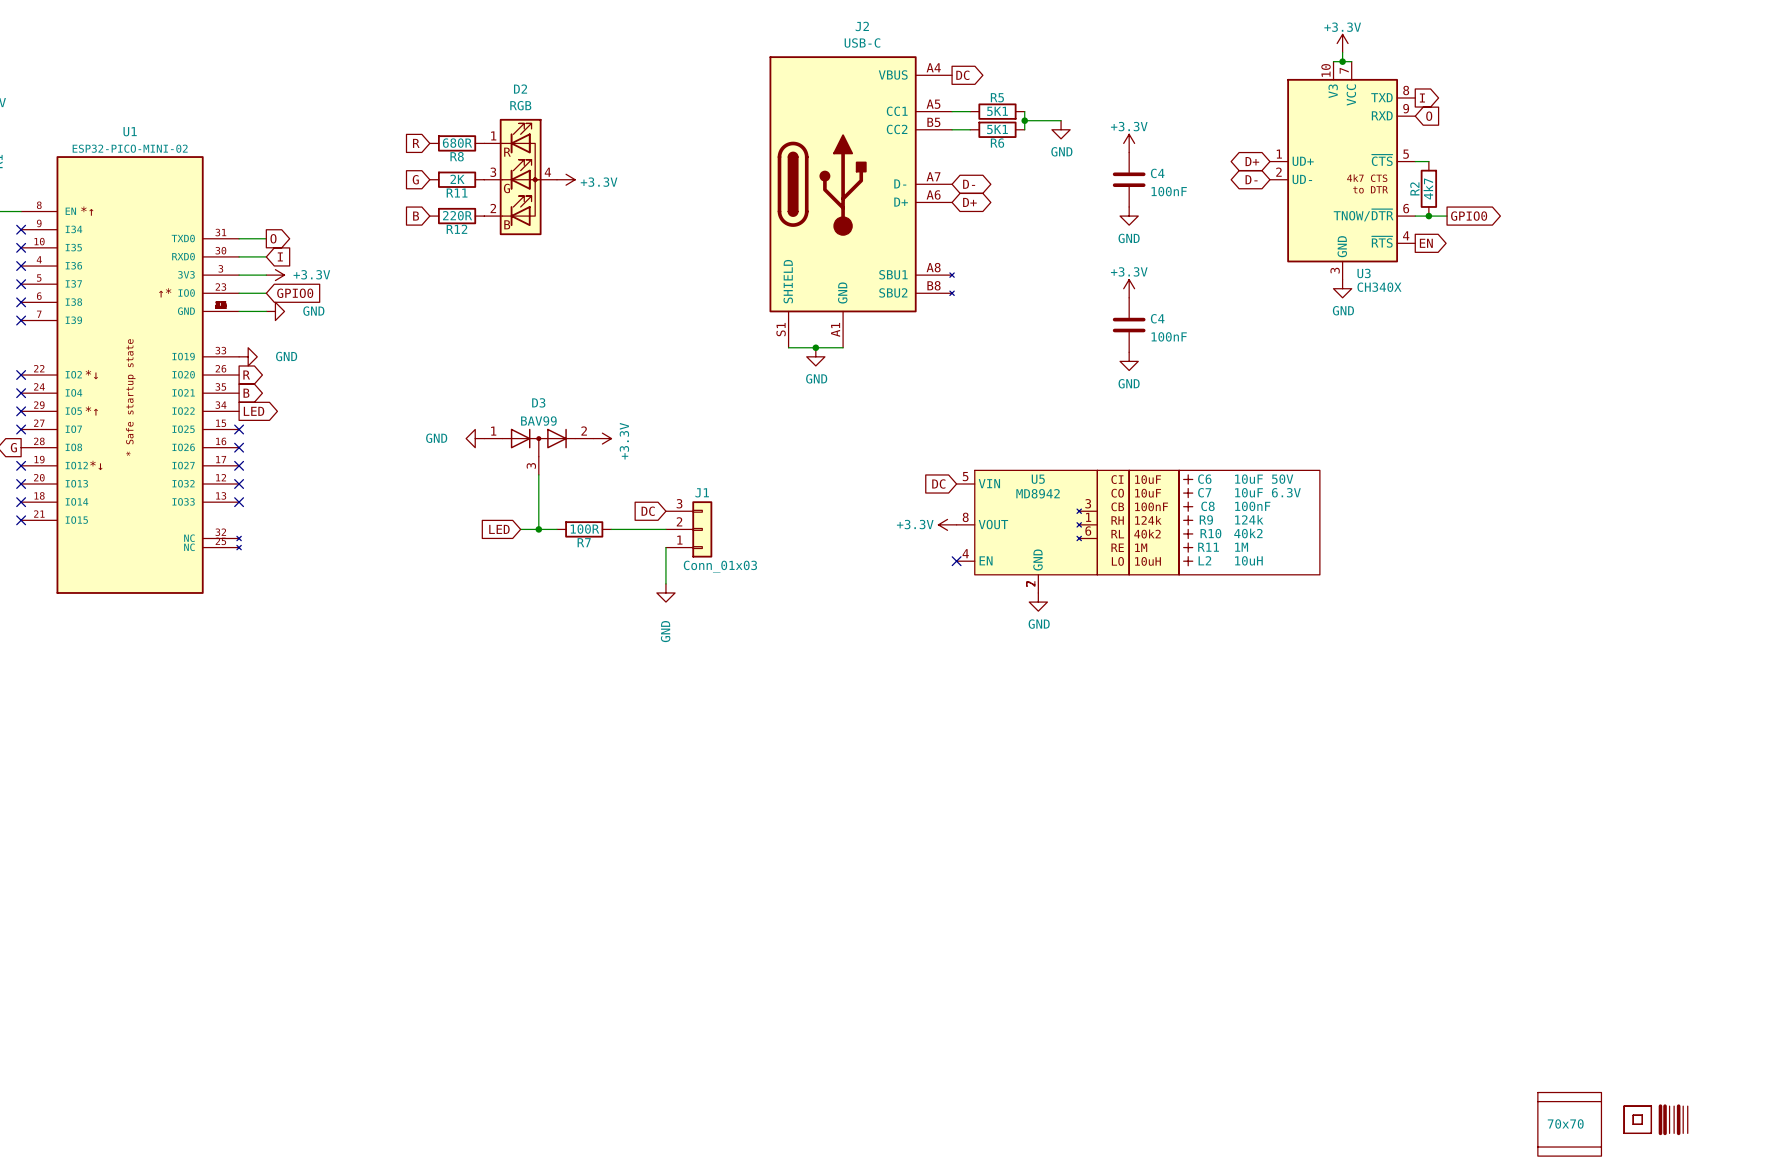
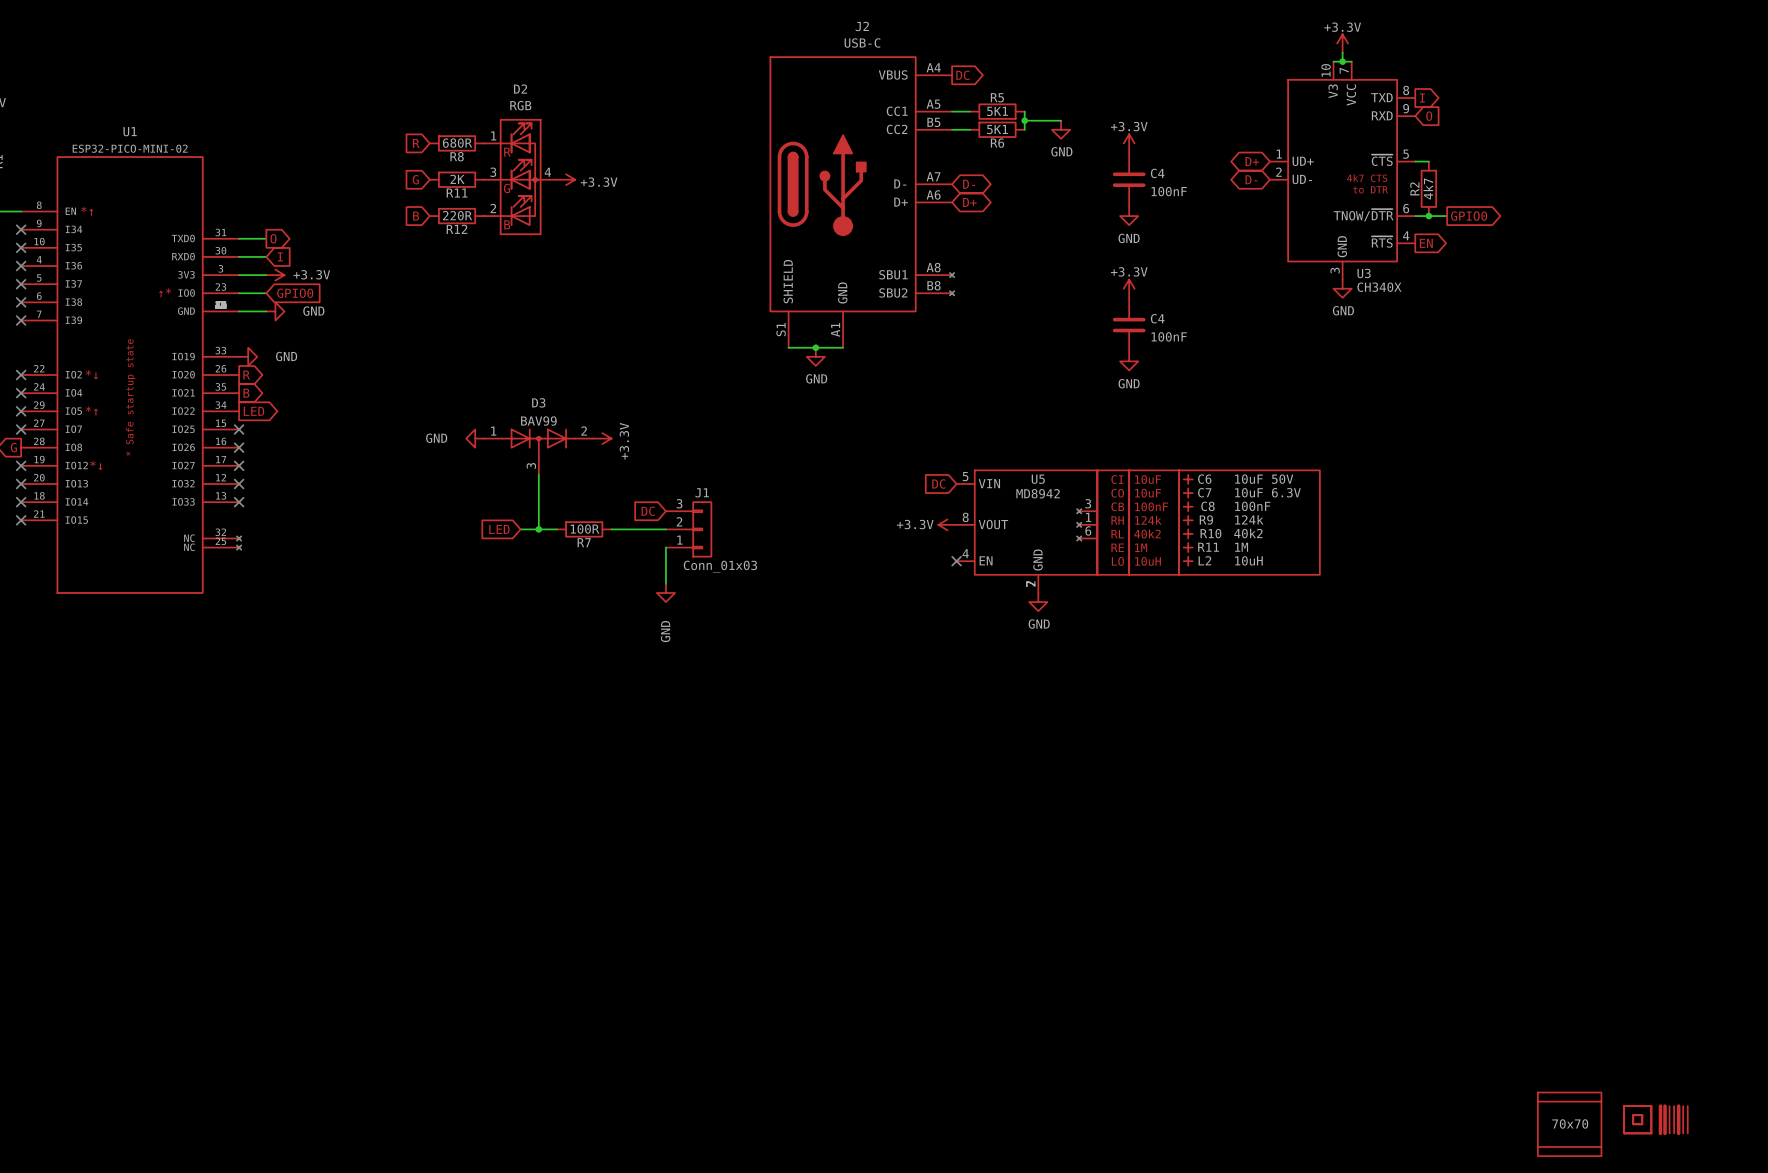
part symbol: [1537, 1092, 1602, 1157] -> [1537, 1092, 1602, 1157]

